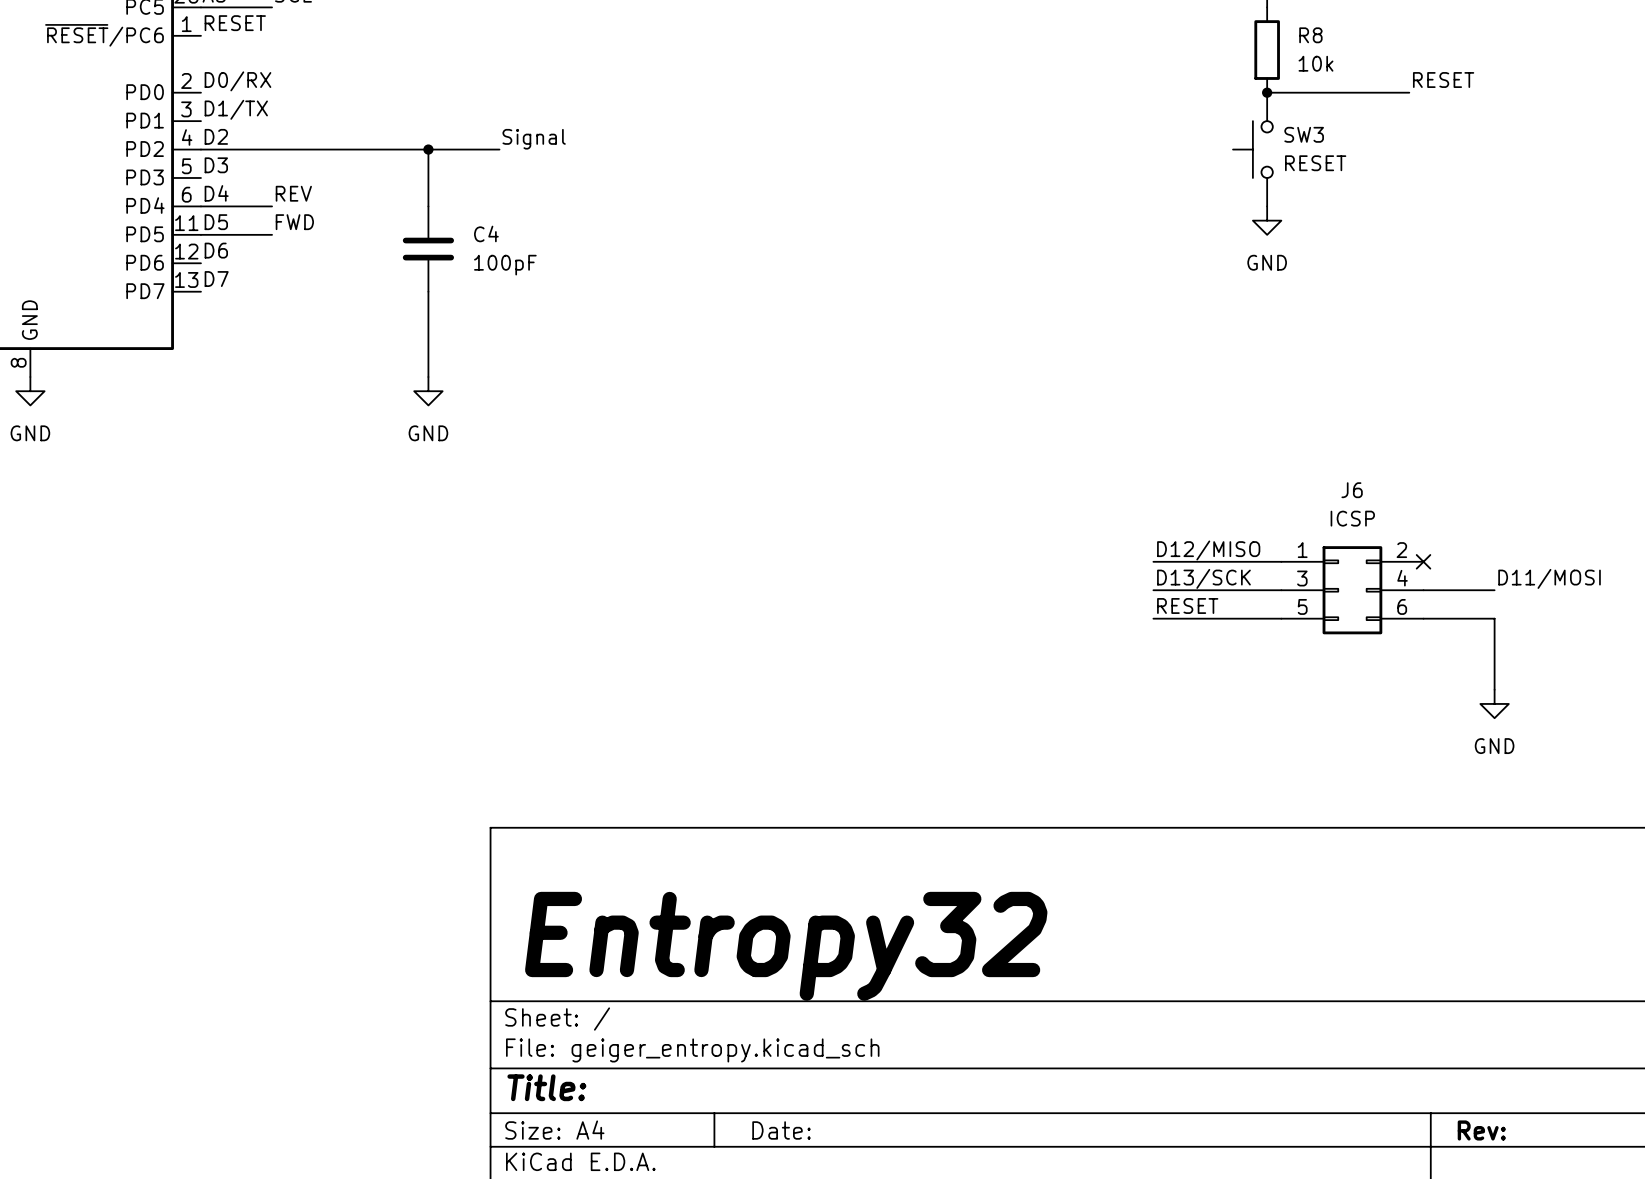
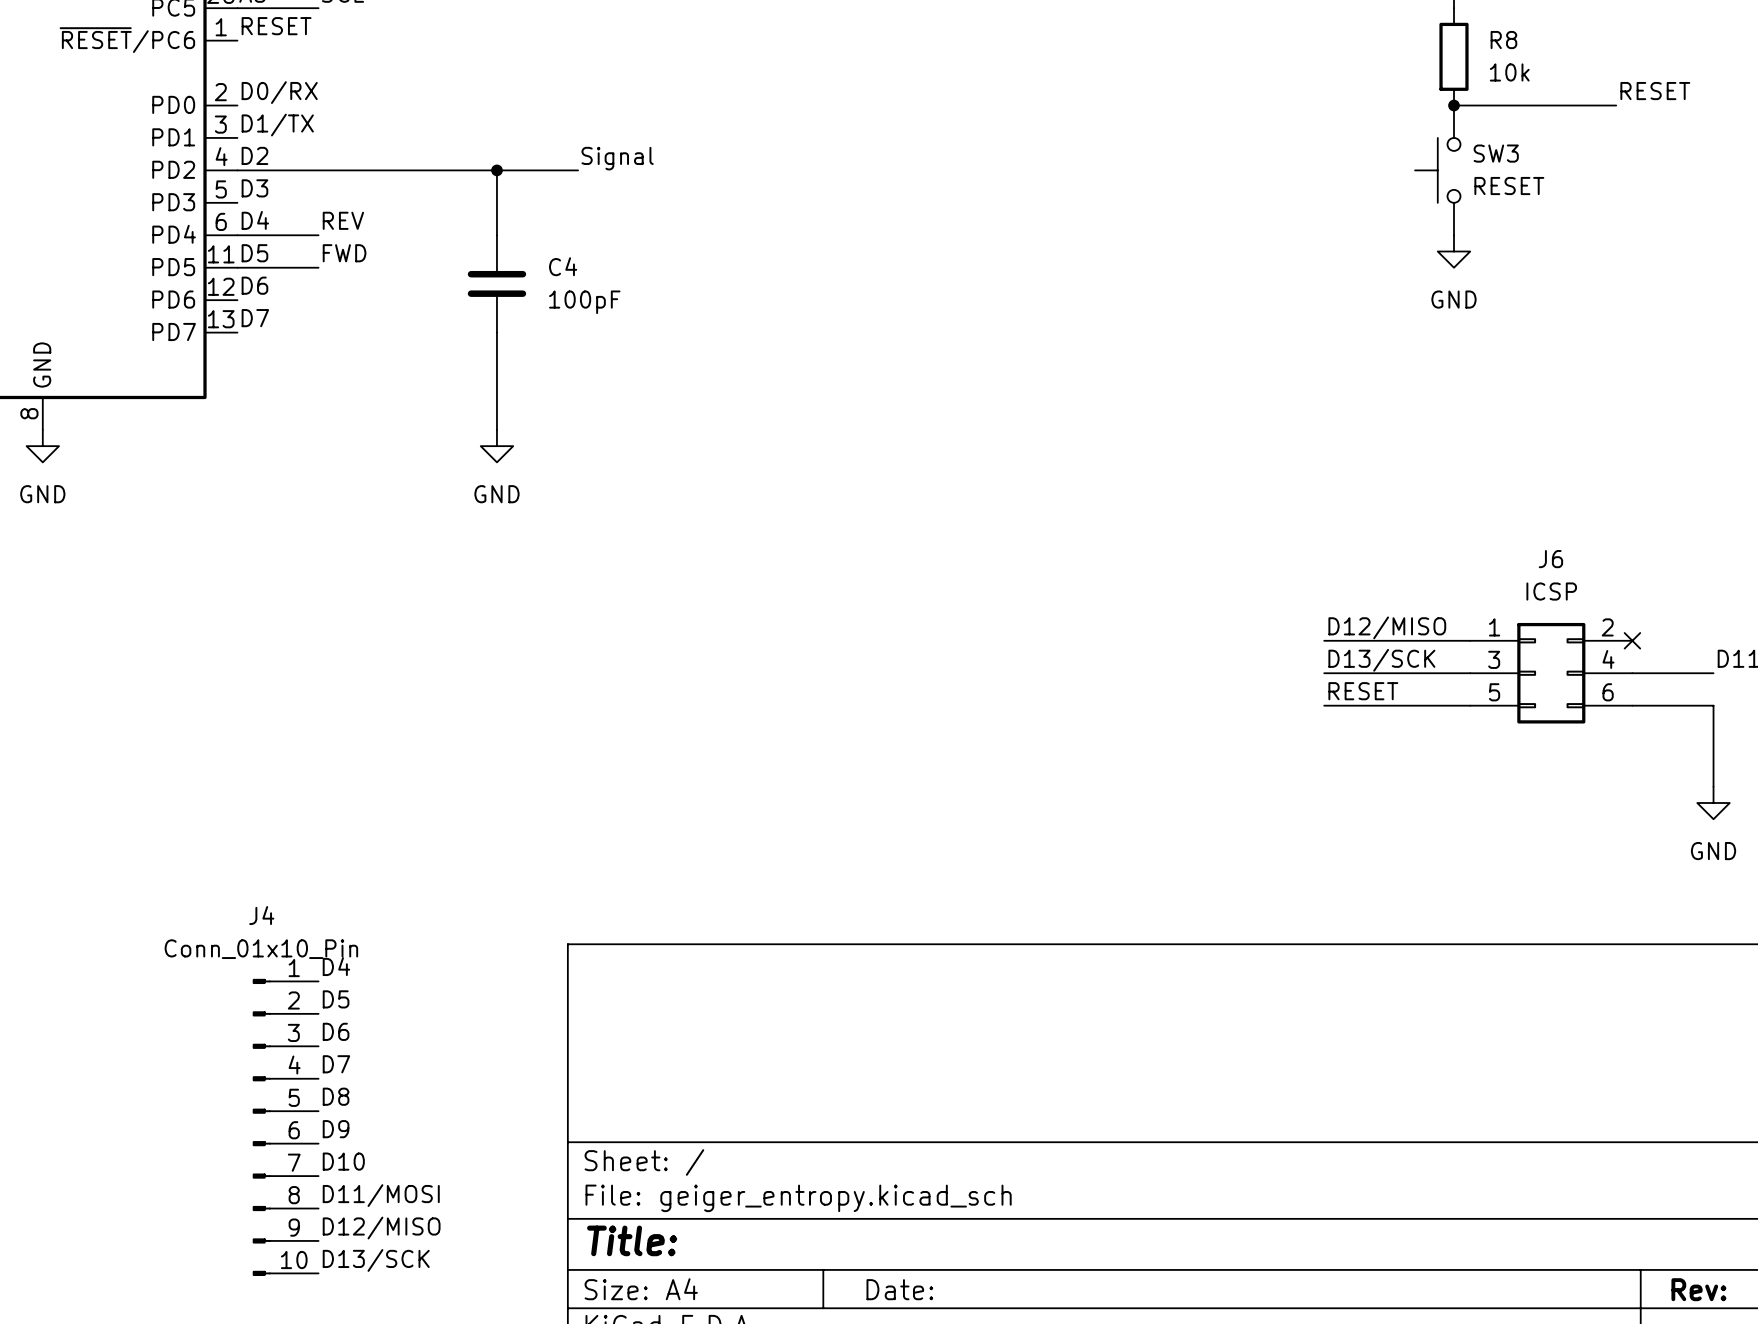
label: none -> D4 (336, 966)
label: none -> D5 (336, 999)
label: none -> D6 (336, 1031)
label: none -> D7 (336, 1064)
text: Entropy32 (786, 946) -> none
label: none -> D8 (336, 1096)
J4: none -> Conn_01x10_Pin (285, 1127)
label: none -> D9 (336, 1129)
label: none -> D10 (343, 1161)
label: none -> D11/MOSI (381, 1195)
label: none -> D12/MISO (381, 1228)
label: none -> D13/SCK (376, 1260)

